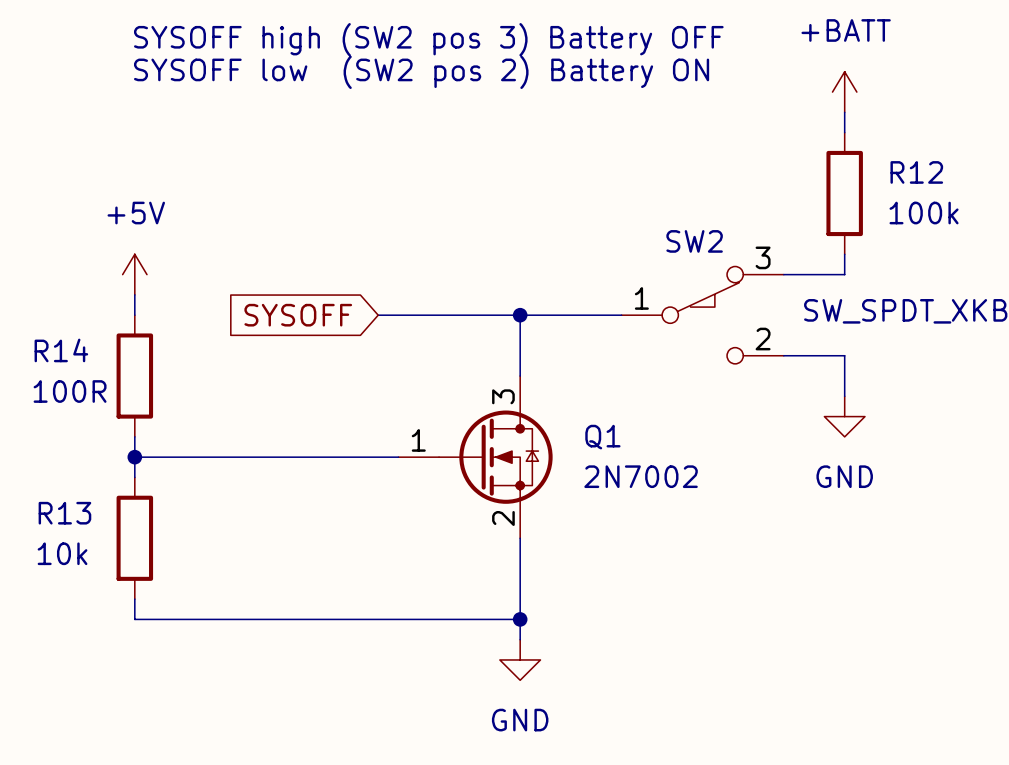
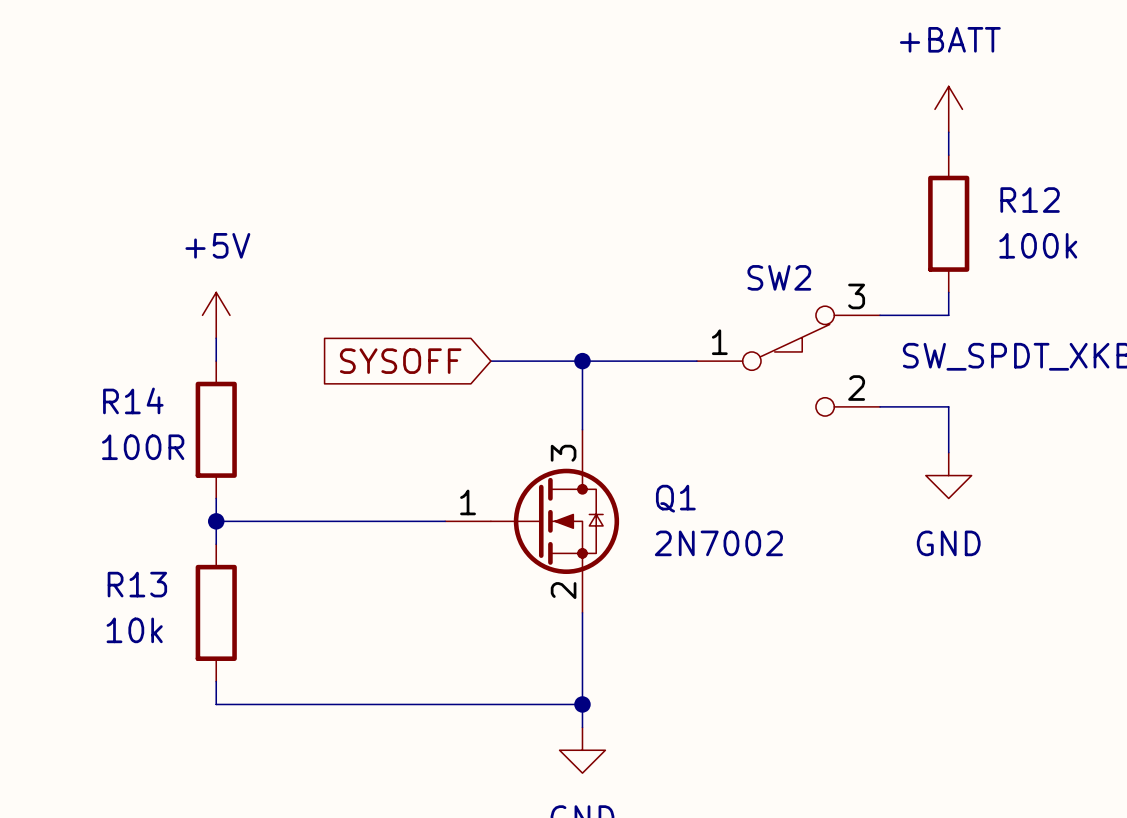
text: SYSOFF high (SW2 pos 3) Battery OFF (428, 39) -> none
text: SYSOFF low (SW2 pos 2) Battery ON (421, 72) -> none
power symbol position: +5V (134, 274) -> +5V (216, 315)
wire: (134, 294) (134, 315) -> (216, 338) (216, 361)
global label position: SYSOFF (298, 315) -> SYSOFF (400, 361)
wire: (378, 315) (439, 315) -> none
R14 position: (134, 376) -> (216, 429)
wire: (134, 436) (134, 477) -> (216, 498) (216, 544)
wire: (134, 457) (195, 457) -> none
junction position: (134, 457) -> (216, 521)
R13 position: (134, 538) -> (216, 612)
wire: (134, 599) (134, 619) (195, 619) -> (216, 681) (216, 704)

